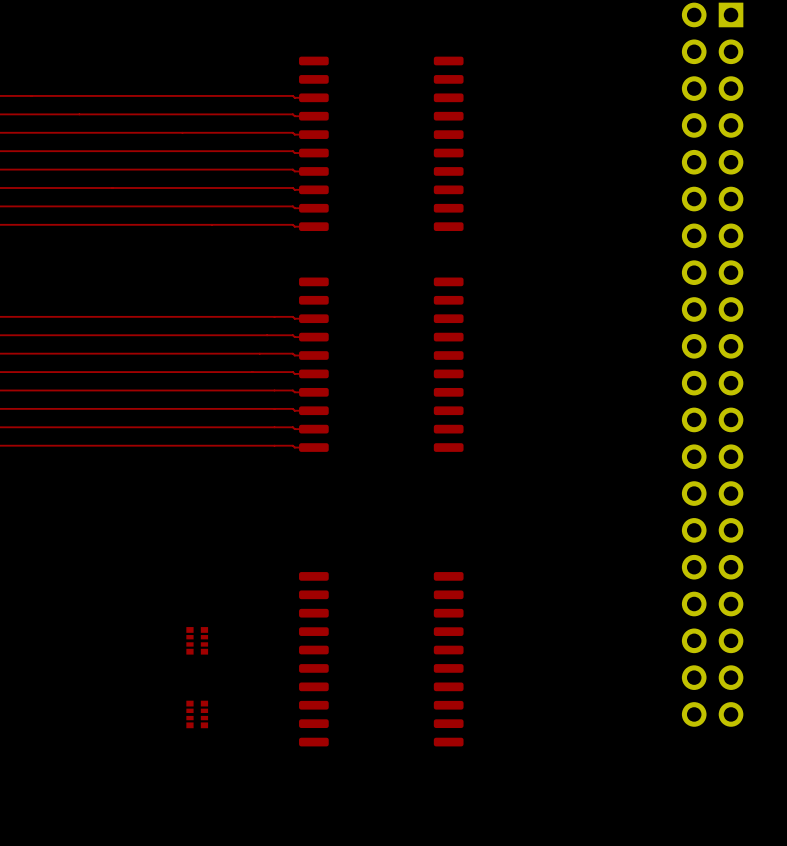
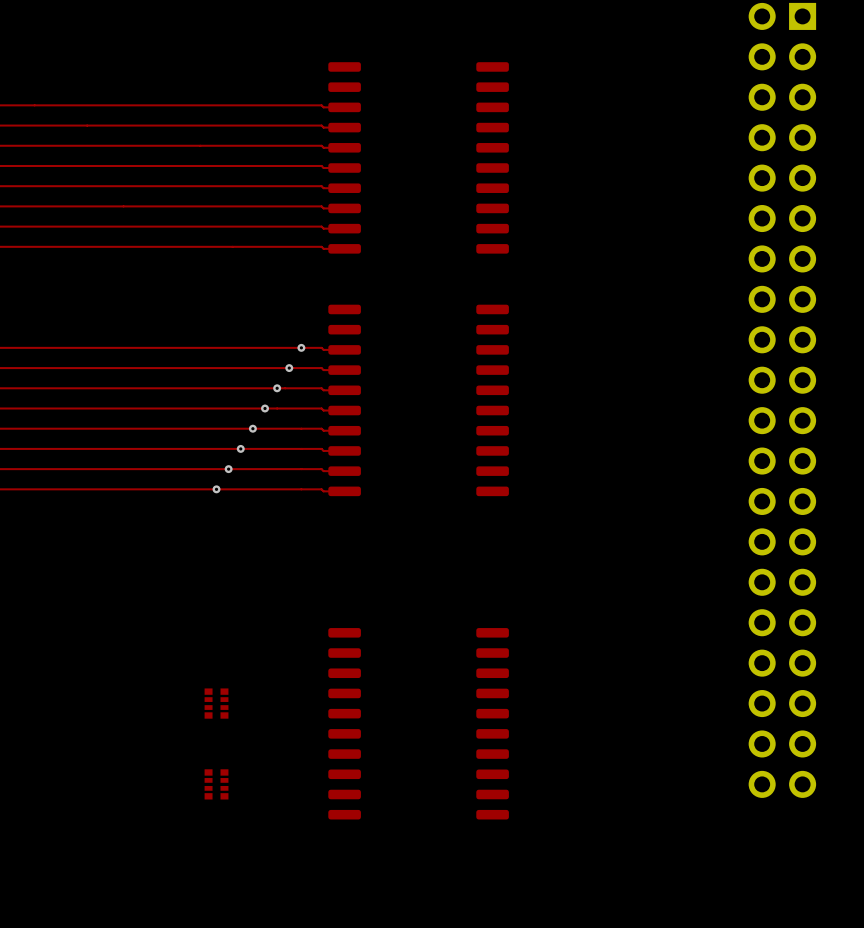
via: none -> (301, 347)
via: none -> (289, 368)
via: none -> (277, 388)
via: none -> (265, 408)
via: none -> (252, 428)
via: none -> (240, 448)
via: none -> (228, 469)
via: none -> (216, 489)

